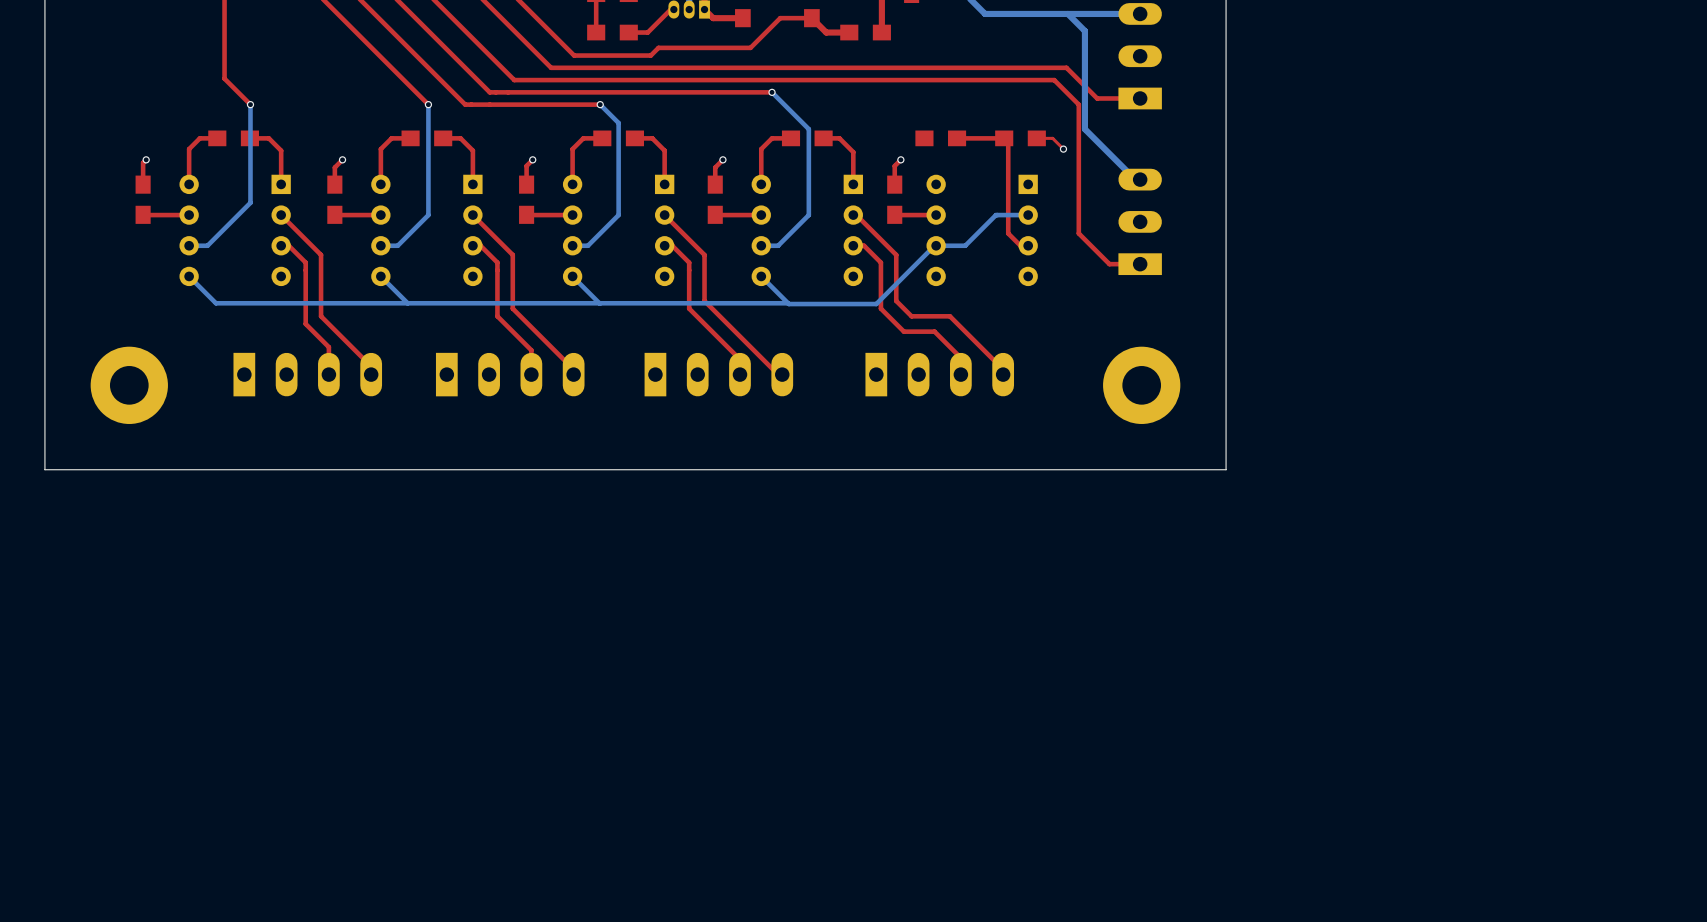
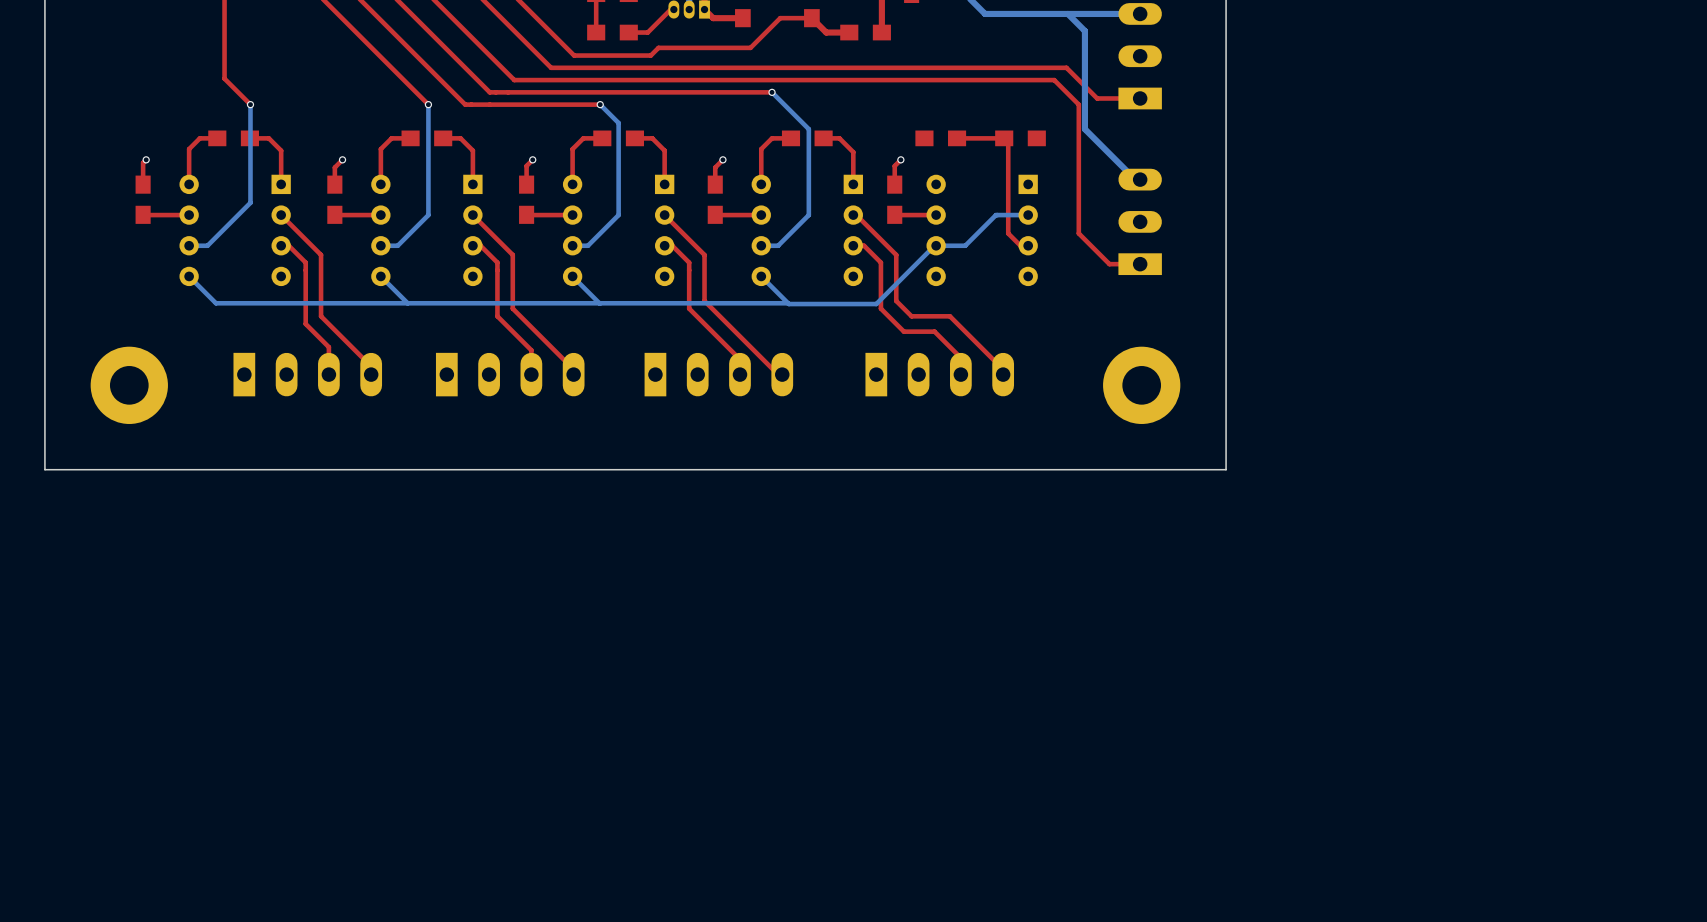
top track: (1036, 138) (1052, 138) (1063, 149) -> none
via: (1063, 149) -> none

